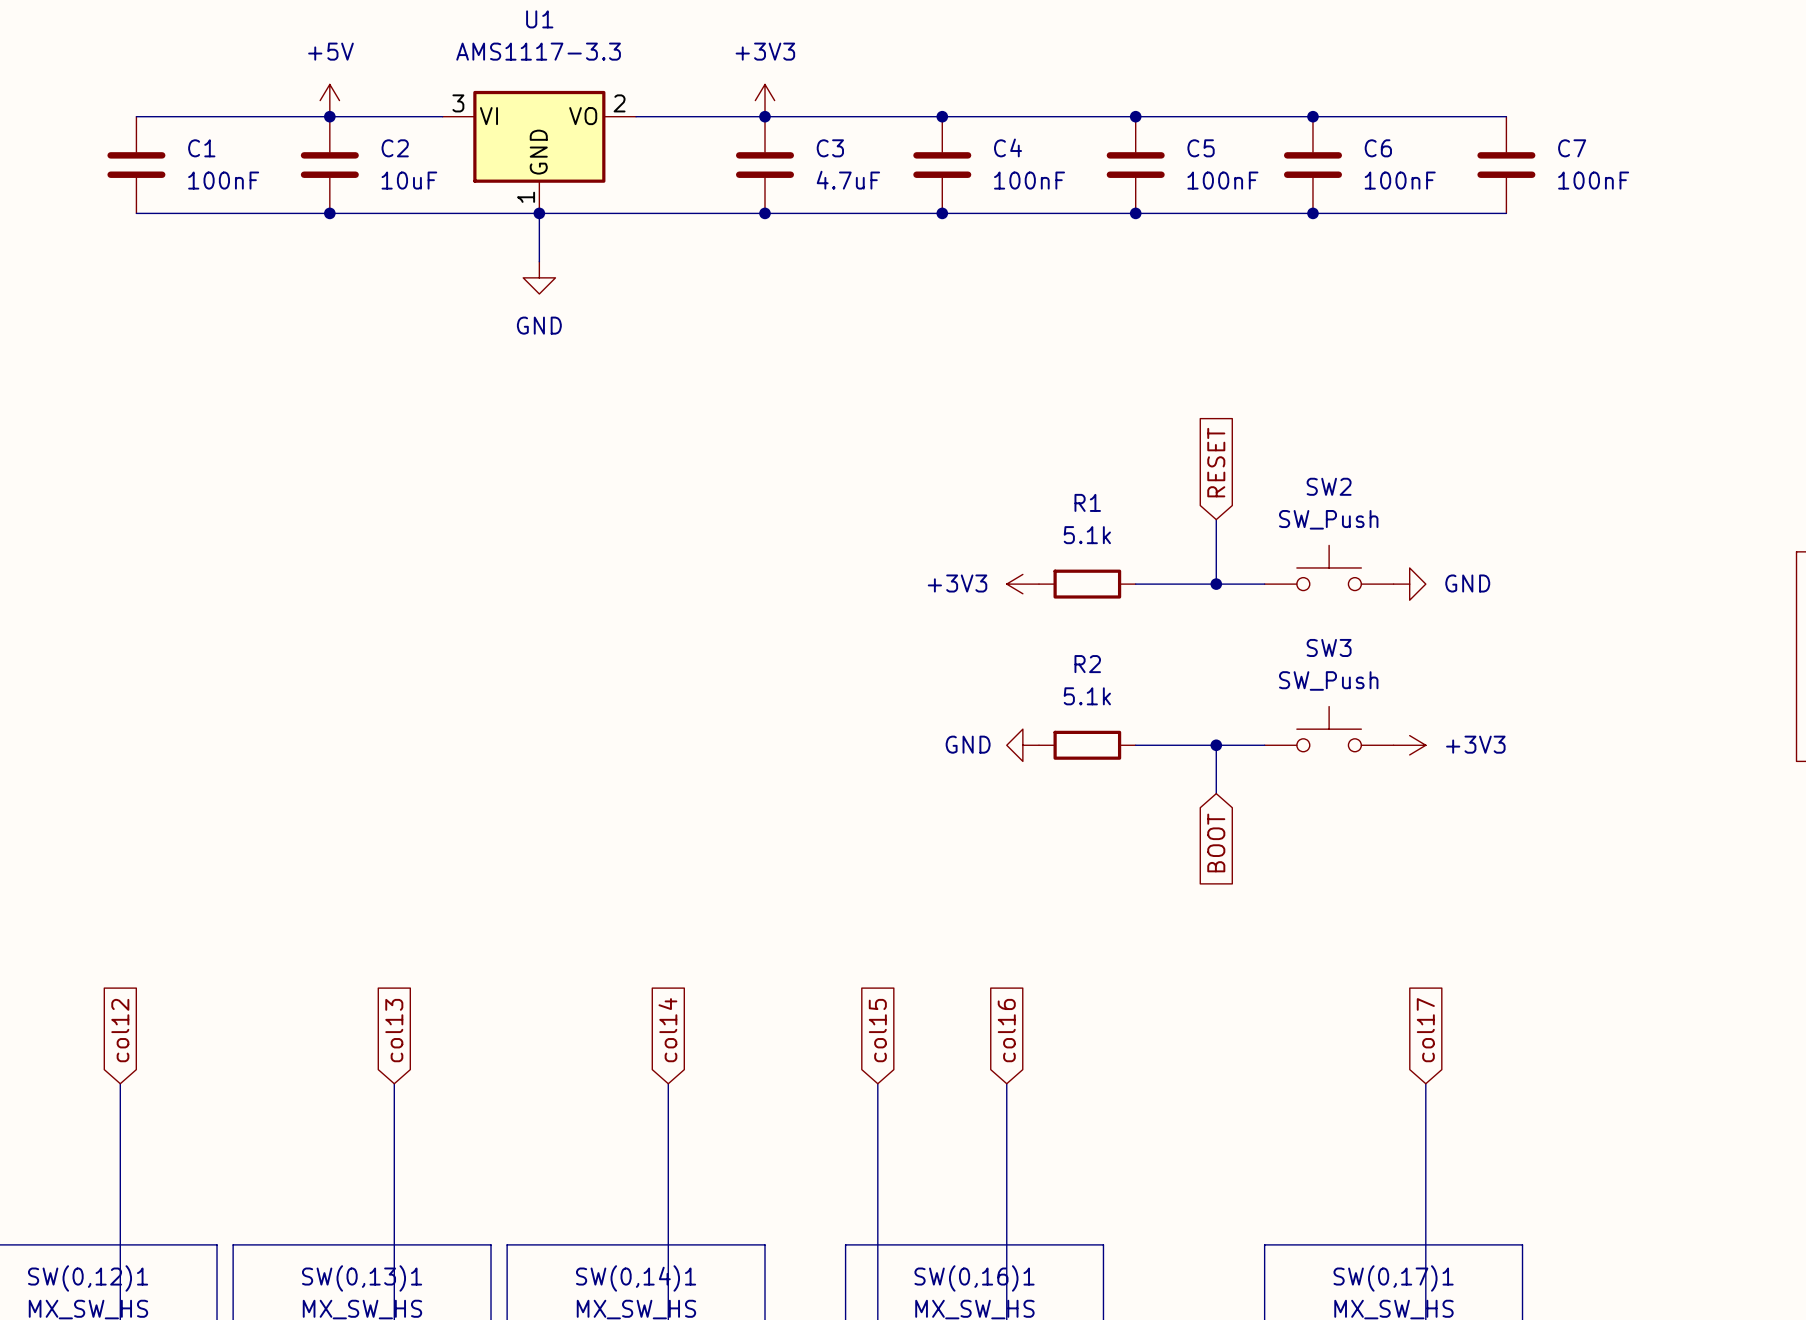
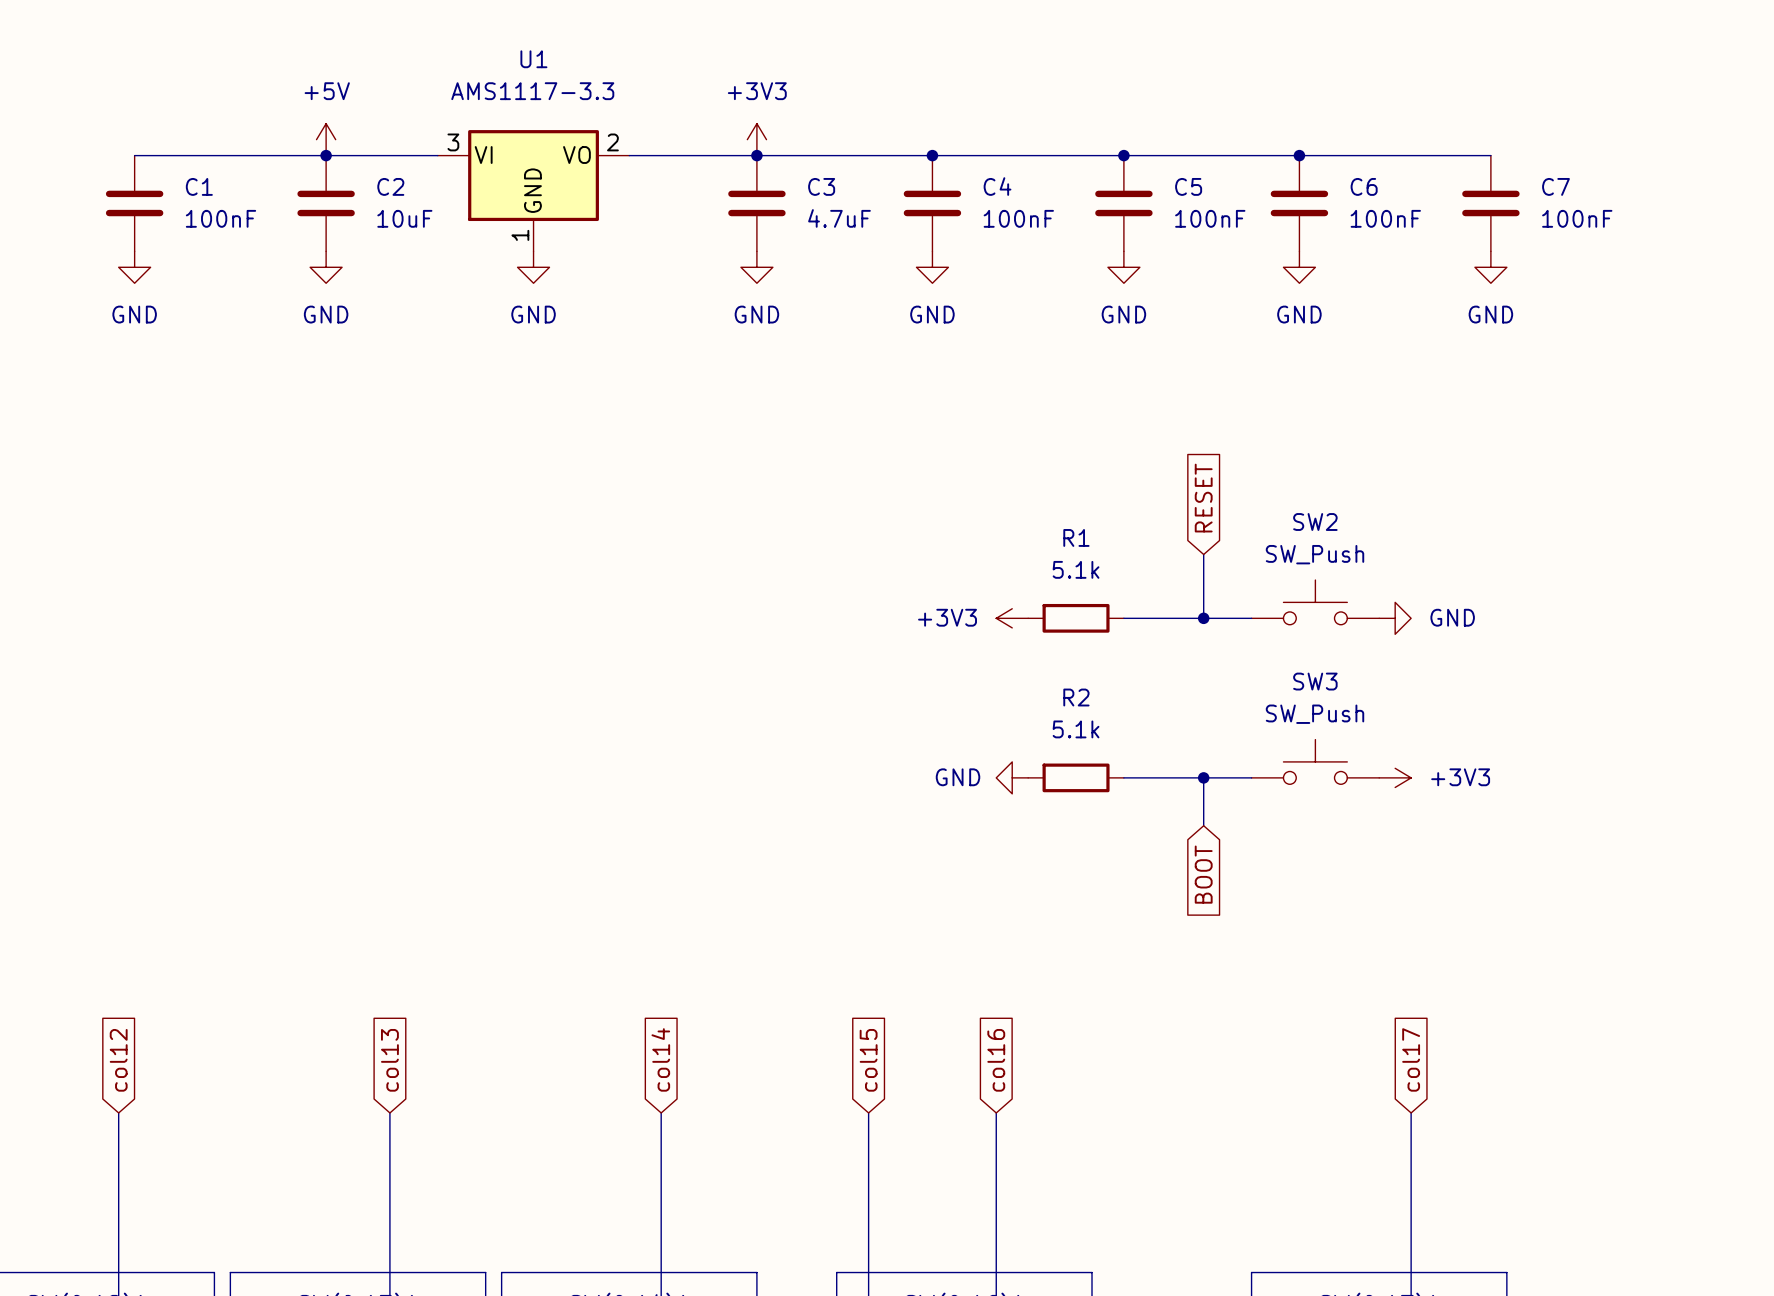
wire: (136, 213) (1506, 213) -> none
junction: (329, 213) -> none
wire: (539, 213) (539, 261) -> none
junction: (539, 213) -> none
junction: (765, 213) -> none
junction: (942, 213) -> none
junction: (1135, 213) -> none
junction: (1312, 213) -> none
power symbol: none -> GND (134, 267)
power symbol: none -> GND (326, 267)
power symbol: none -> GND (756, 267)
power symbol: none -> GND (932, 267)
power symbol: none -> GND (1123, 267)
power symbol: none -> GND (1299, 267)
power symbol: none -> GND (1490, 267)
power symbol position: GND (539, 277) -> GND (533, 267)

